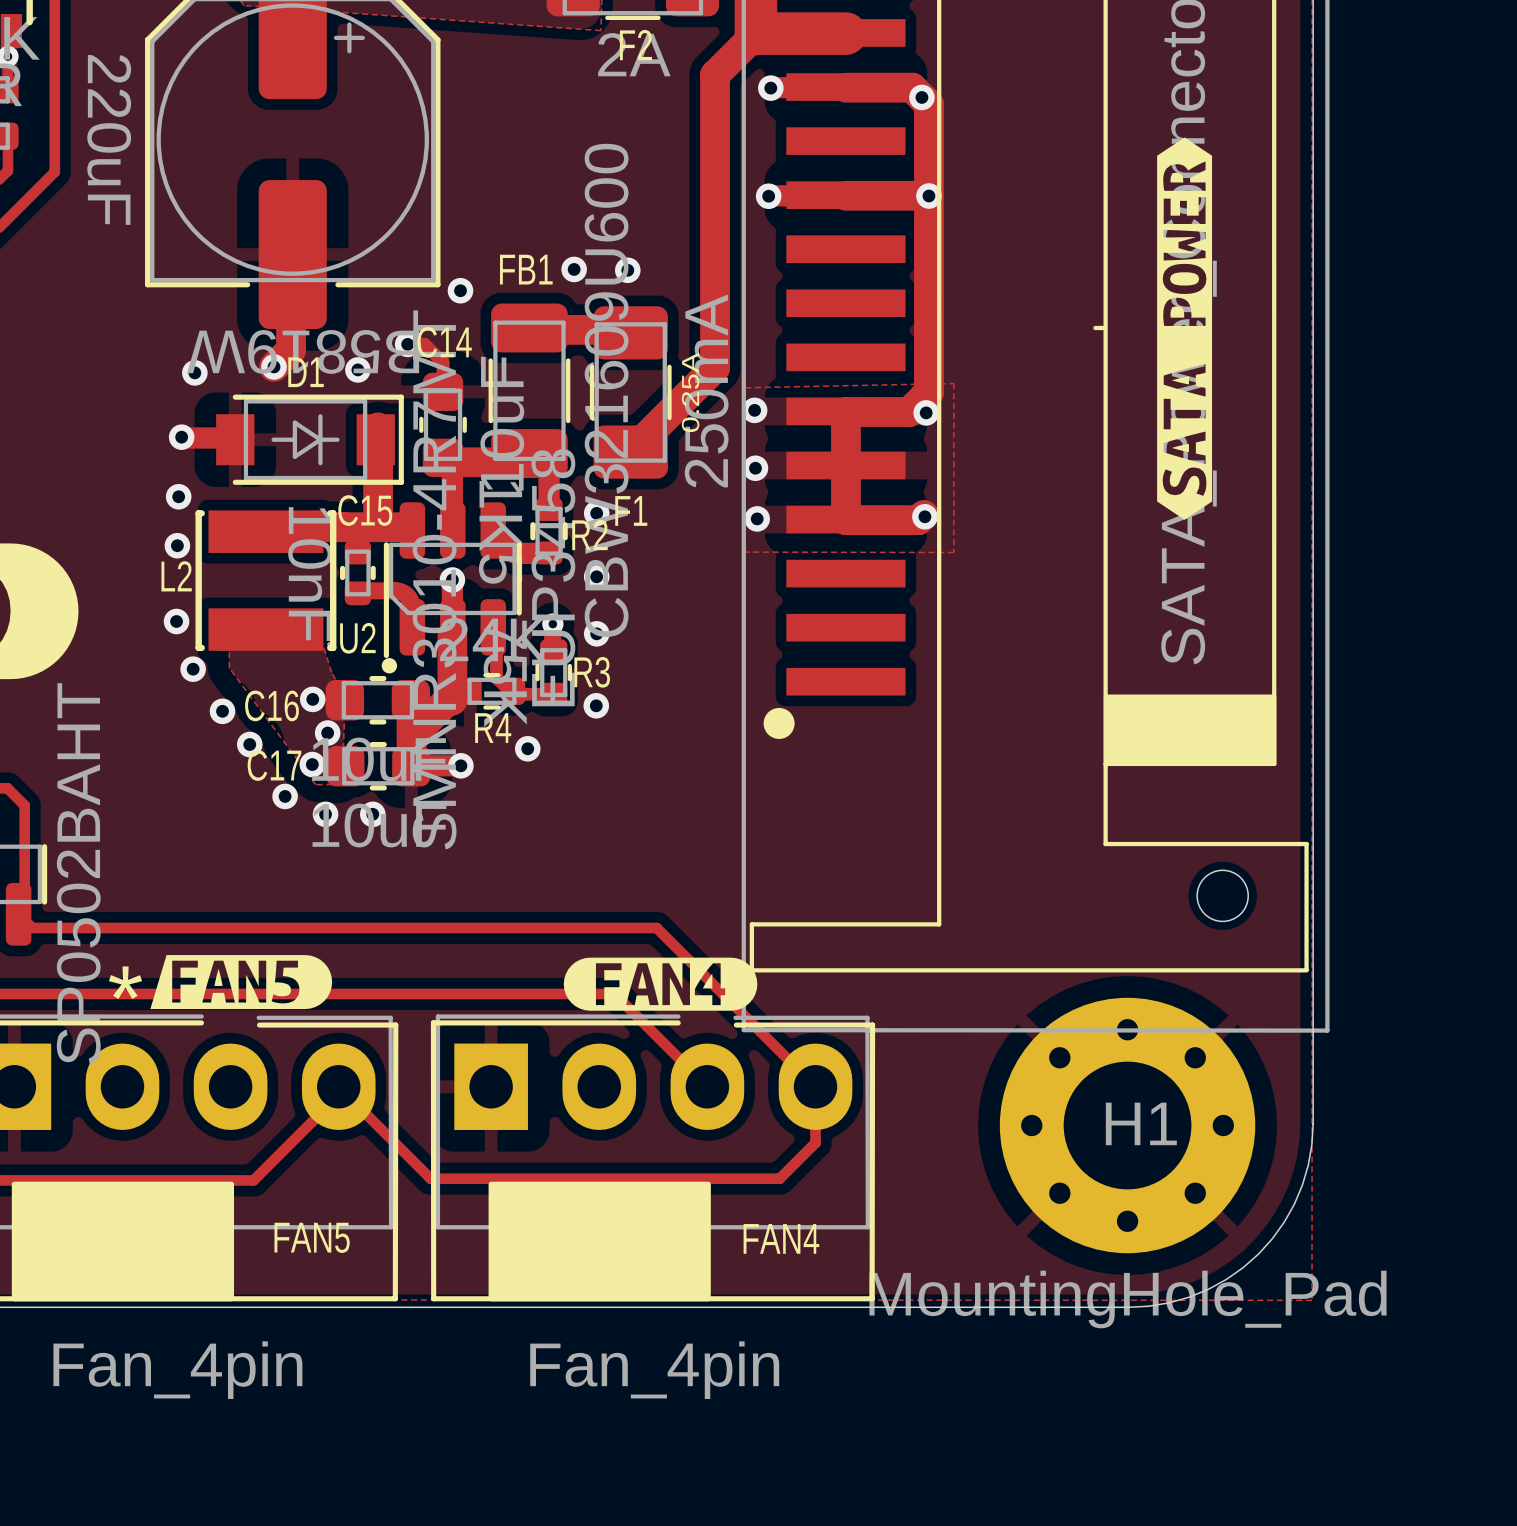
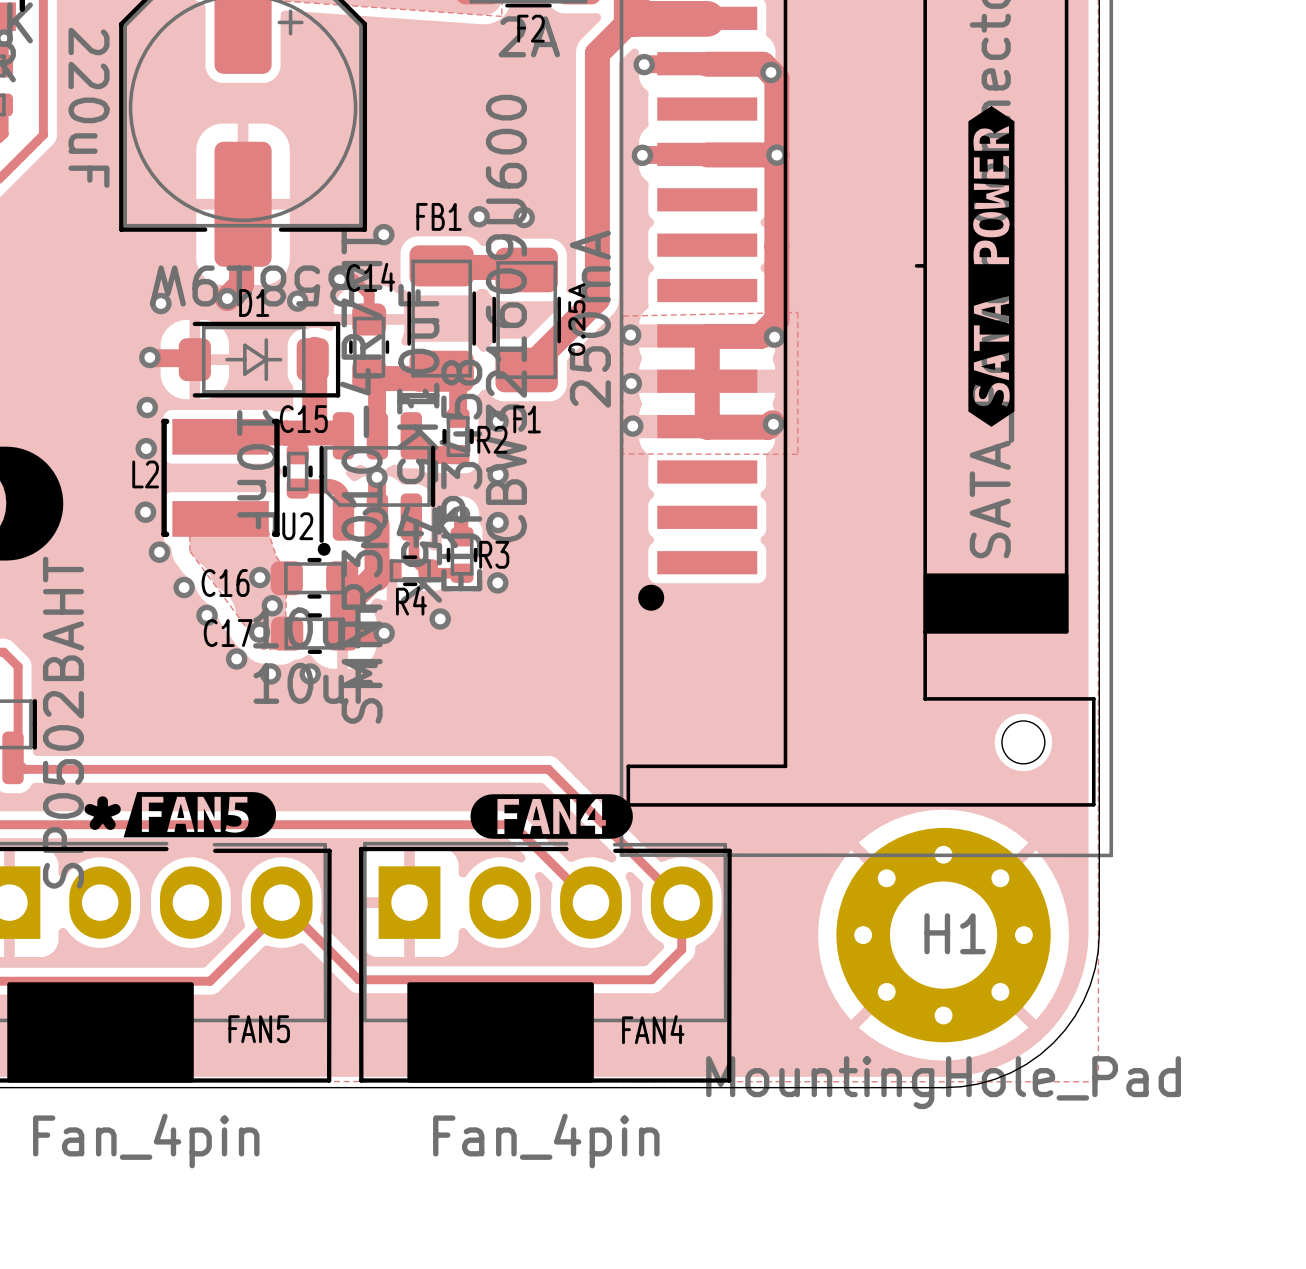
D1 footprint: [216, 394, 404, 485] -> [178, 321, 341, 398]

